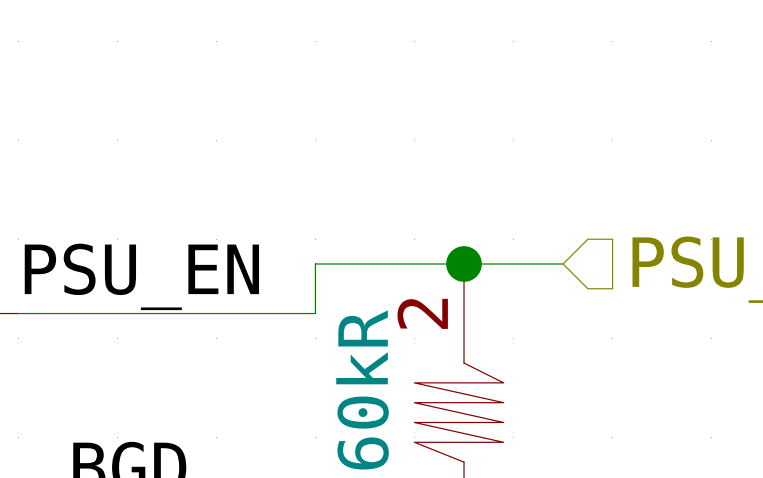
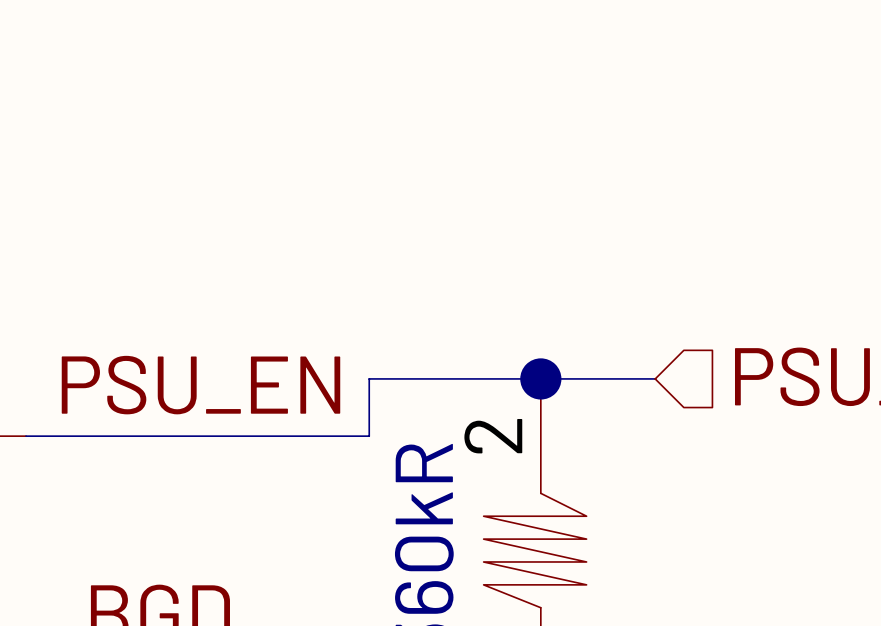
label position: PSU_EN (141, 276) -> PSU_EN (200, 385)

